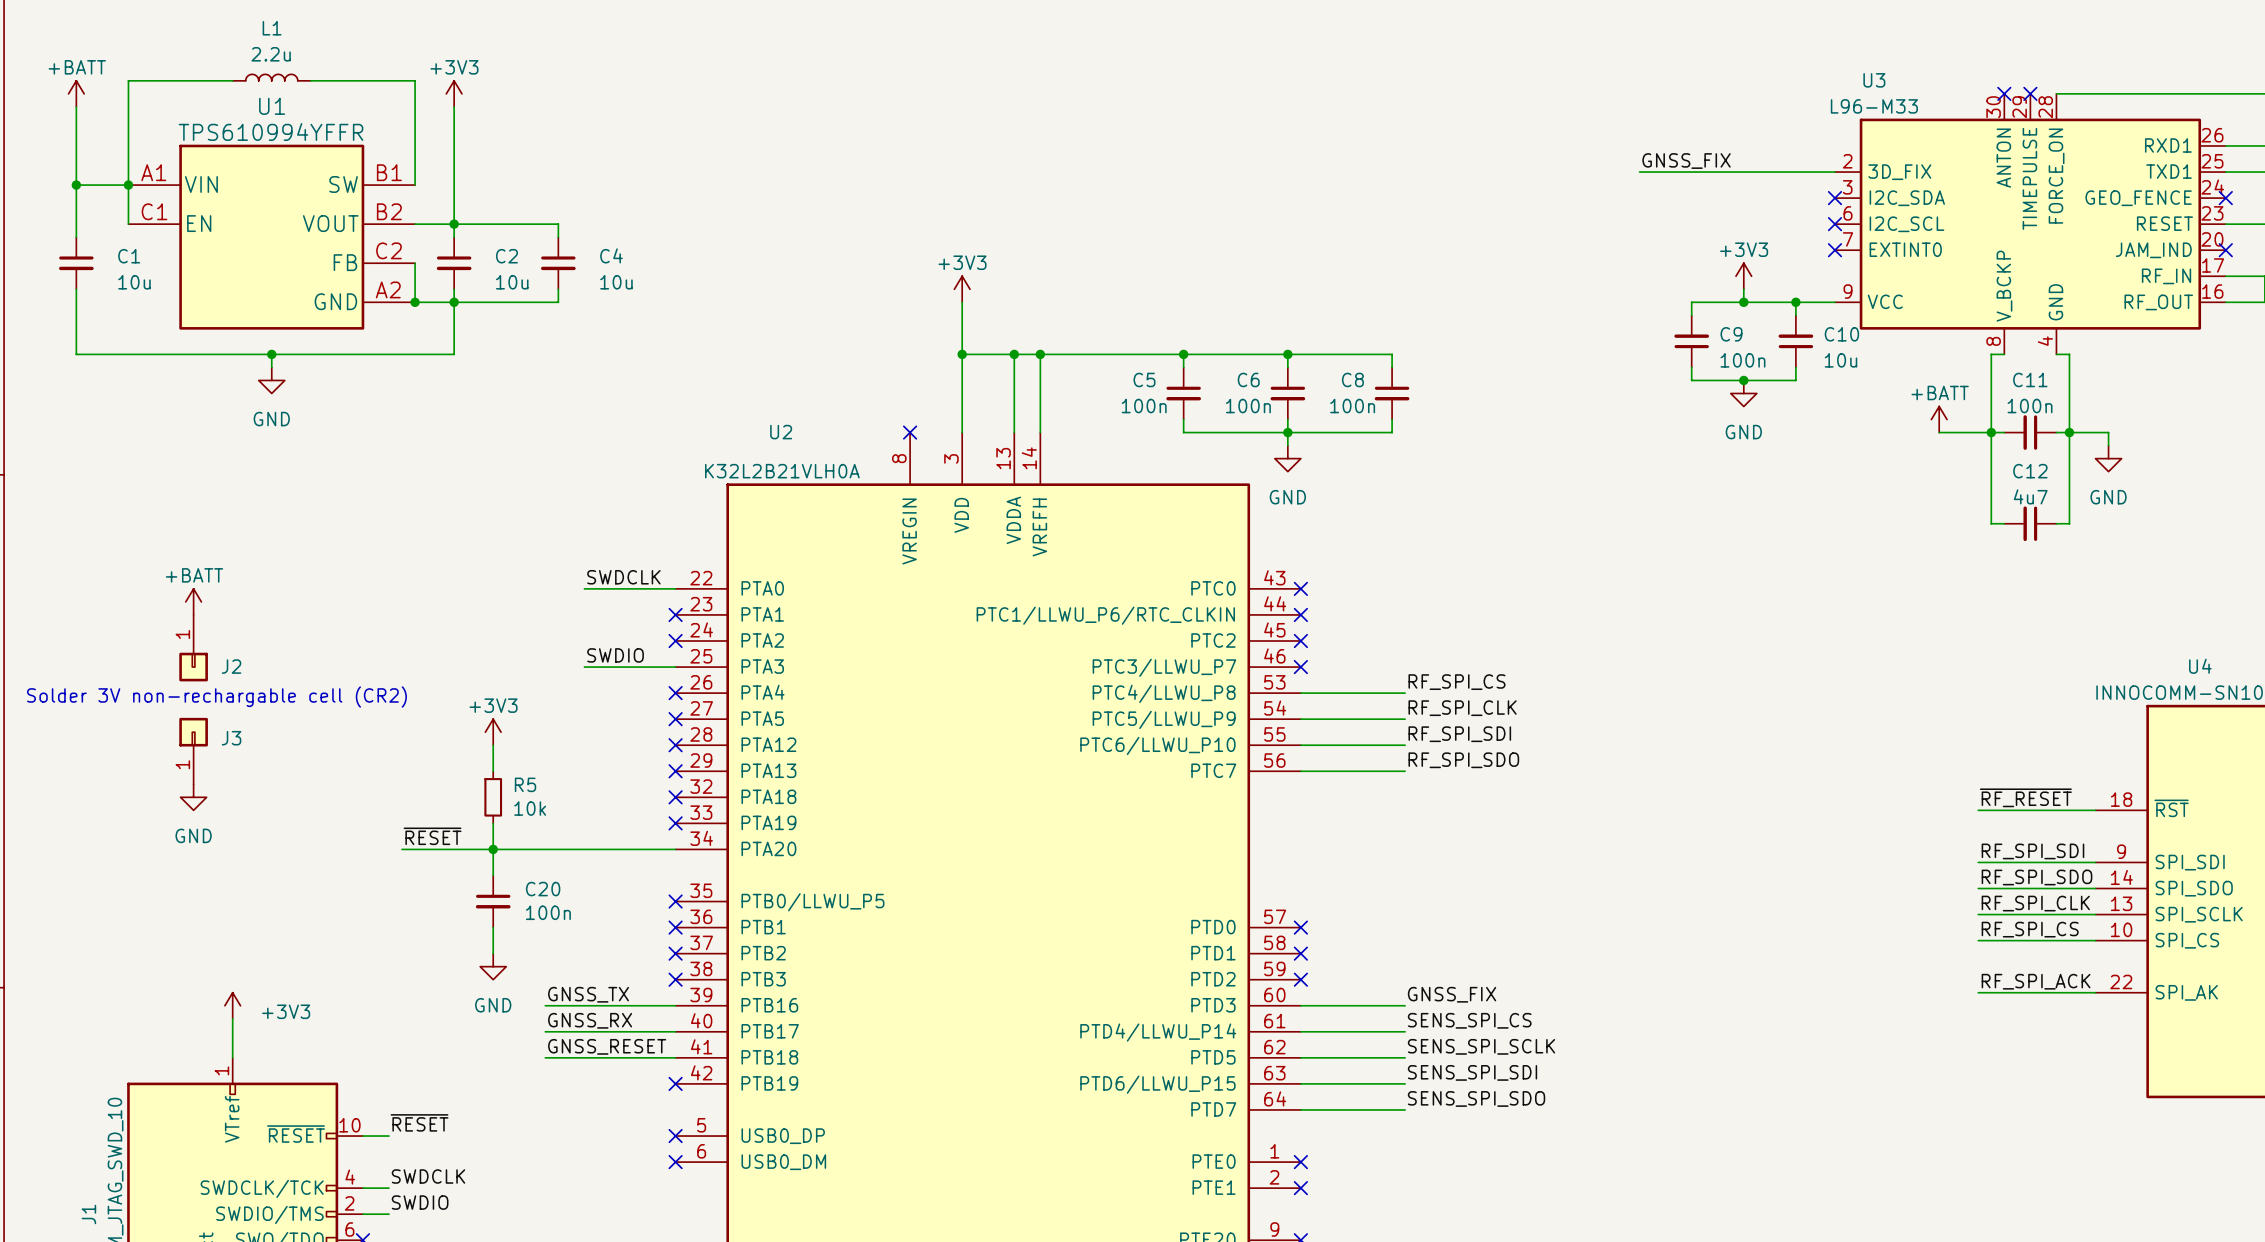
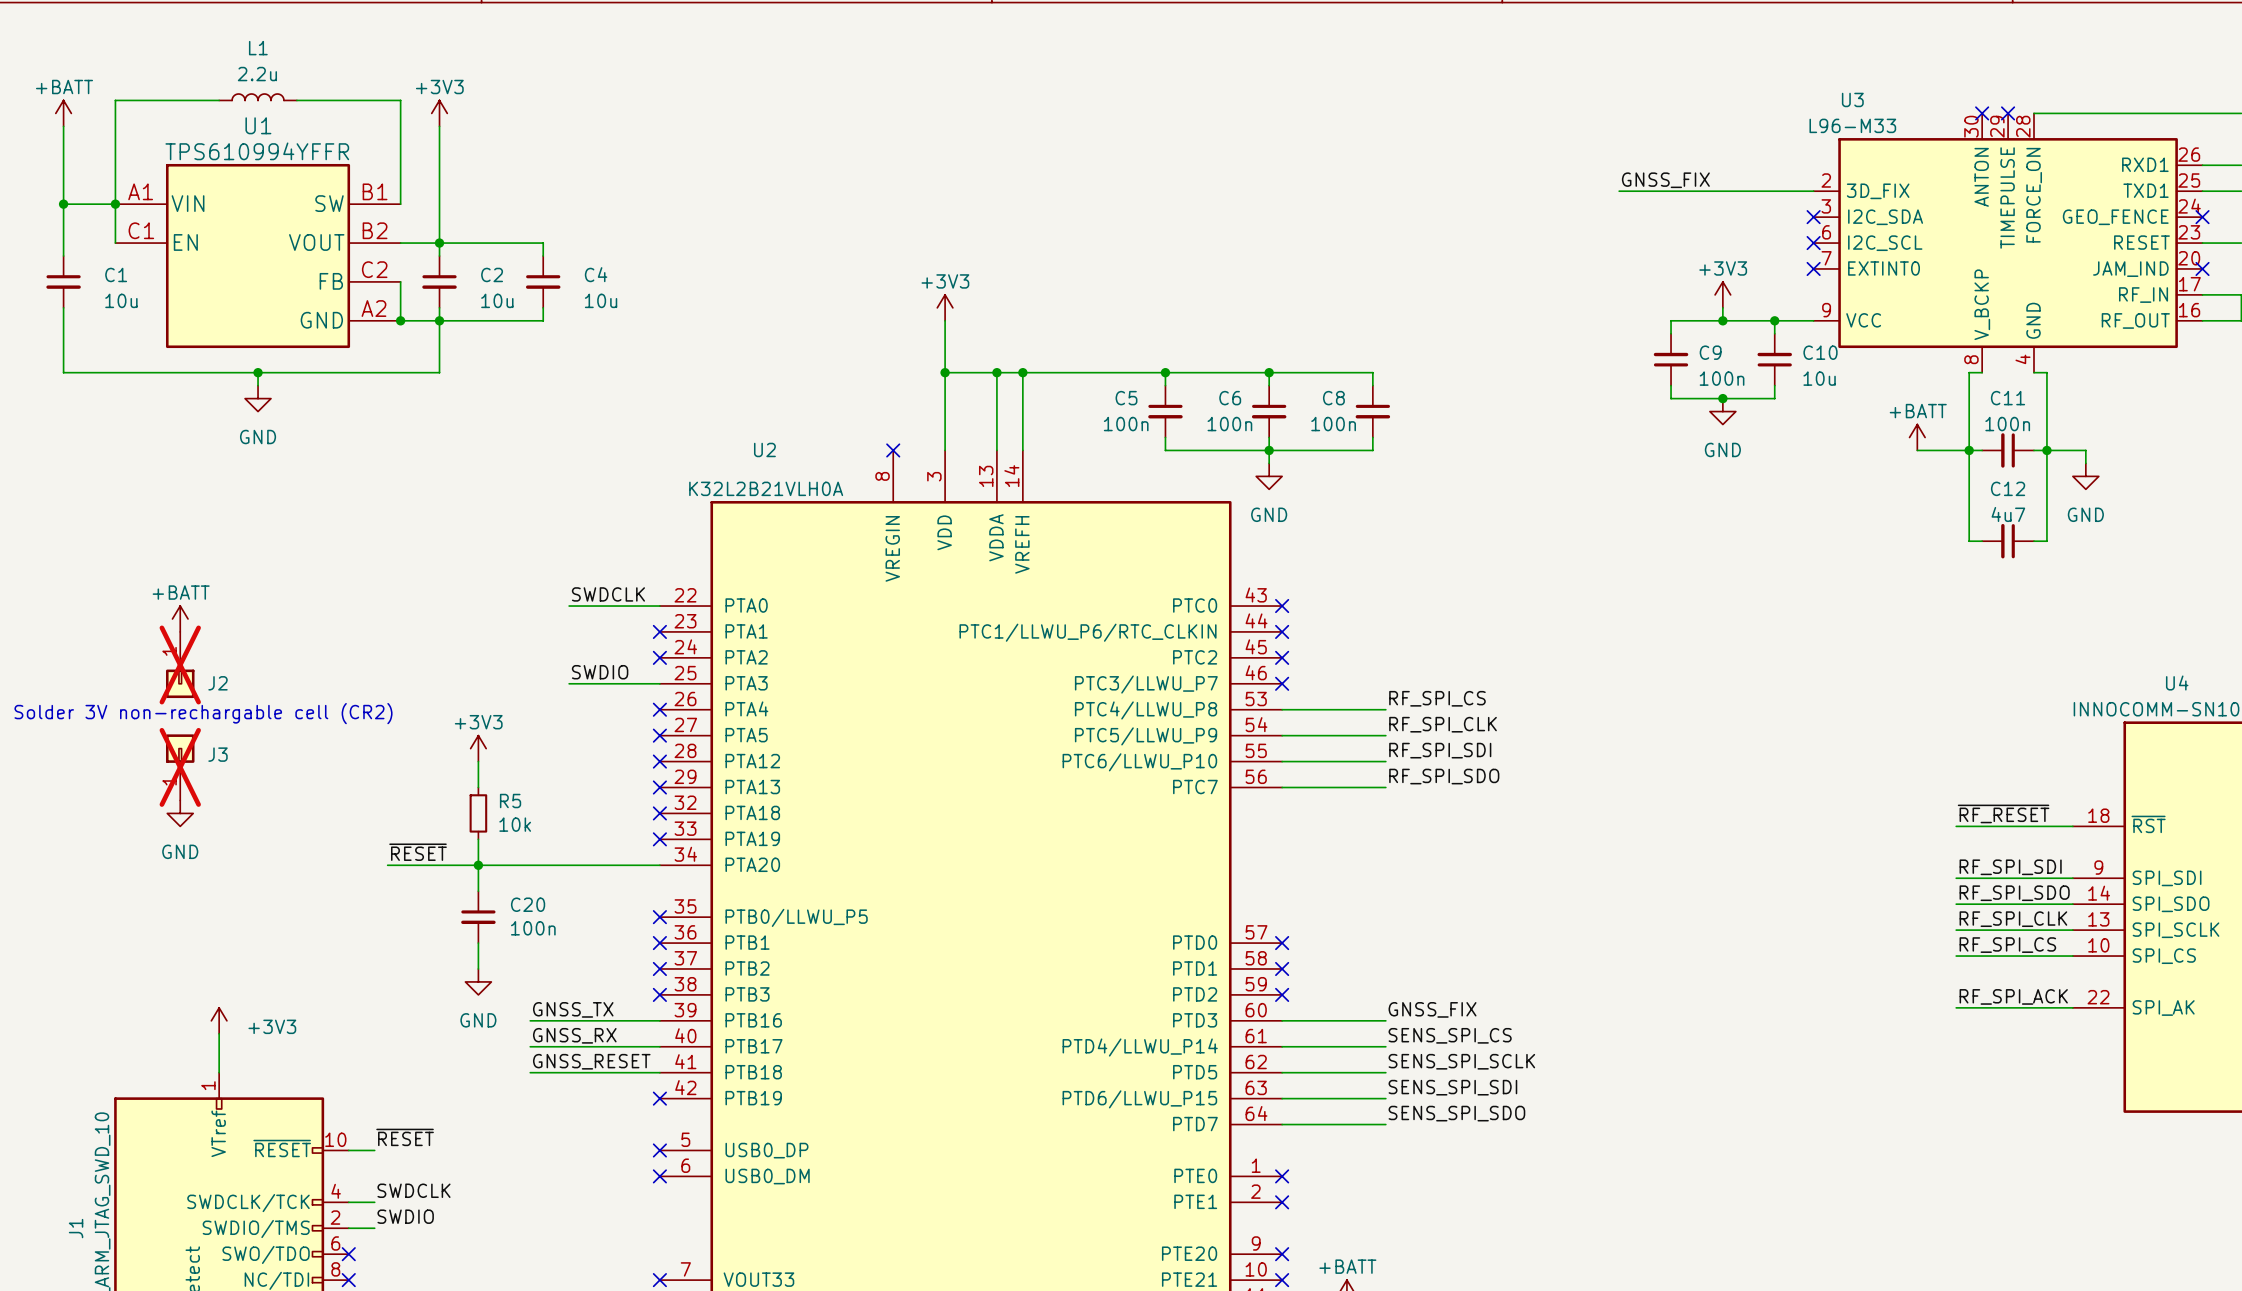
J2 do-not-place cross: none -> (180, 665)
J3 do-not-place cross: none -> (180, 767)

